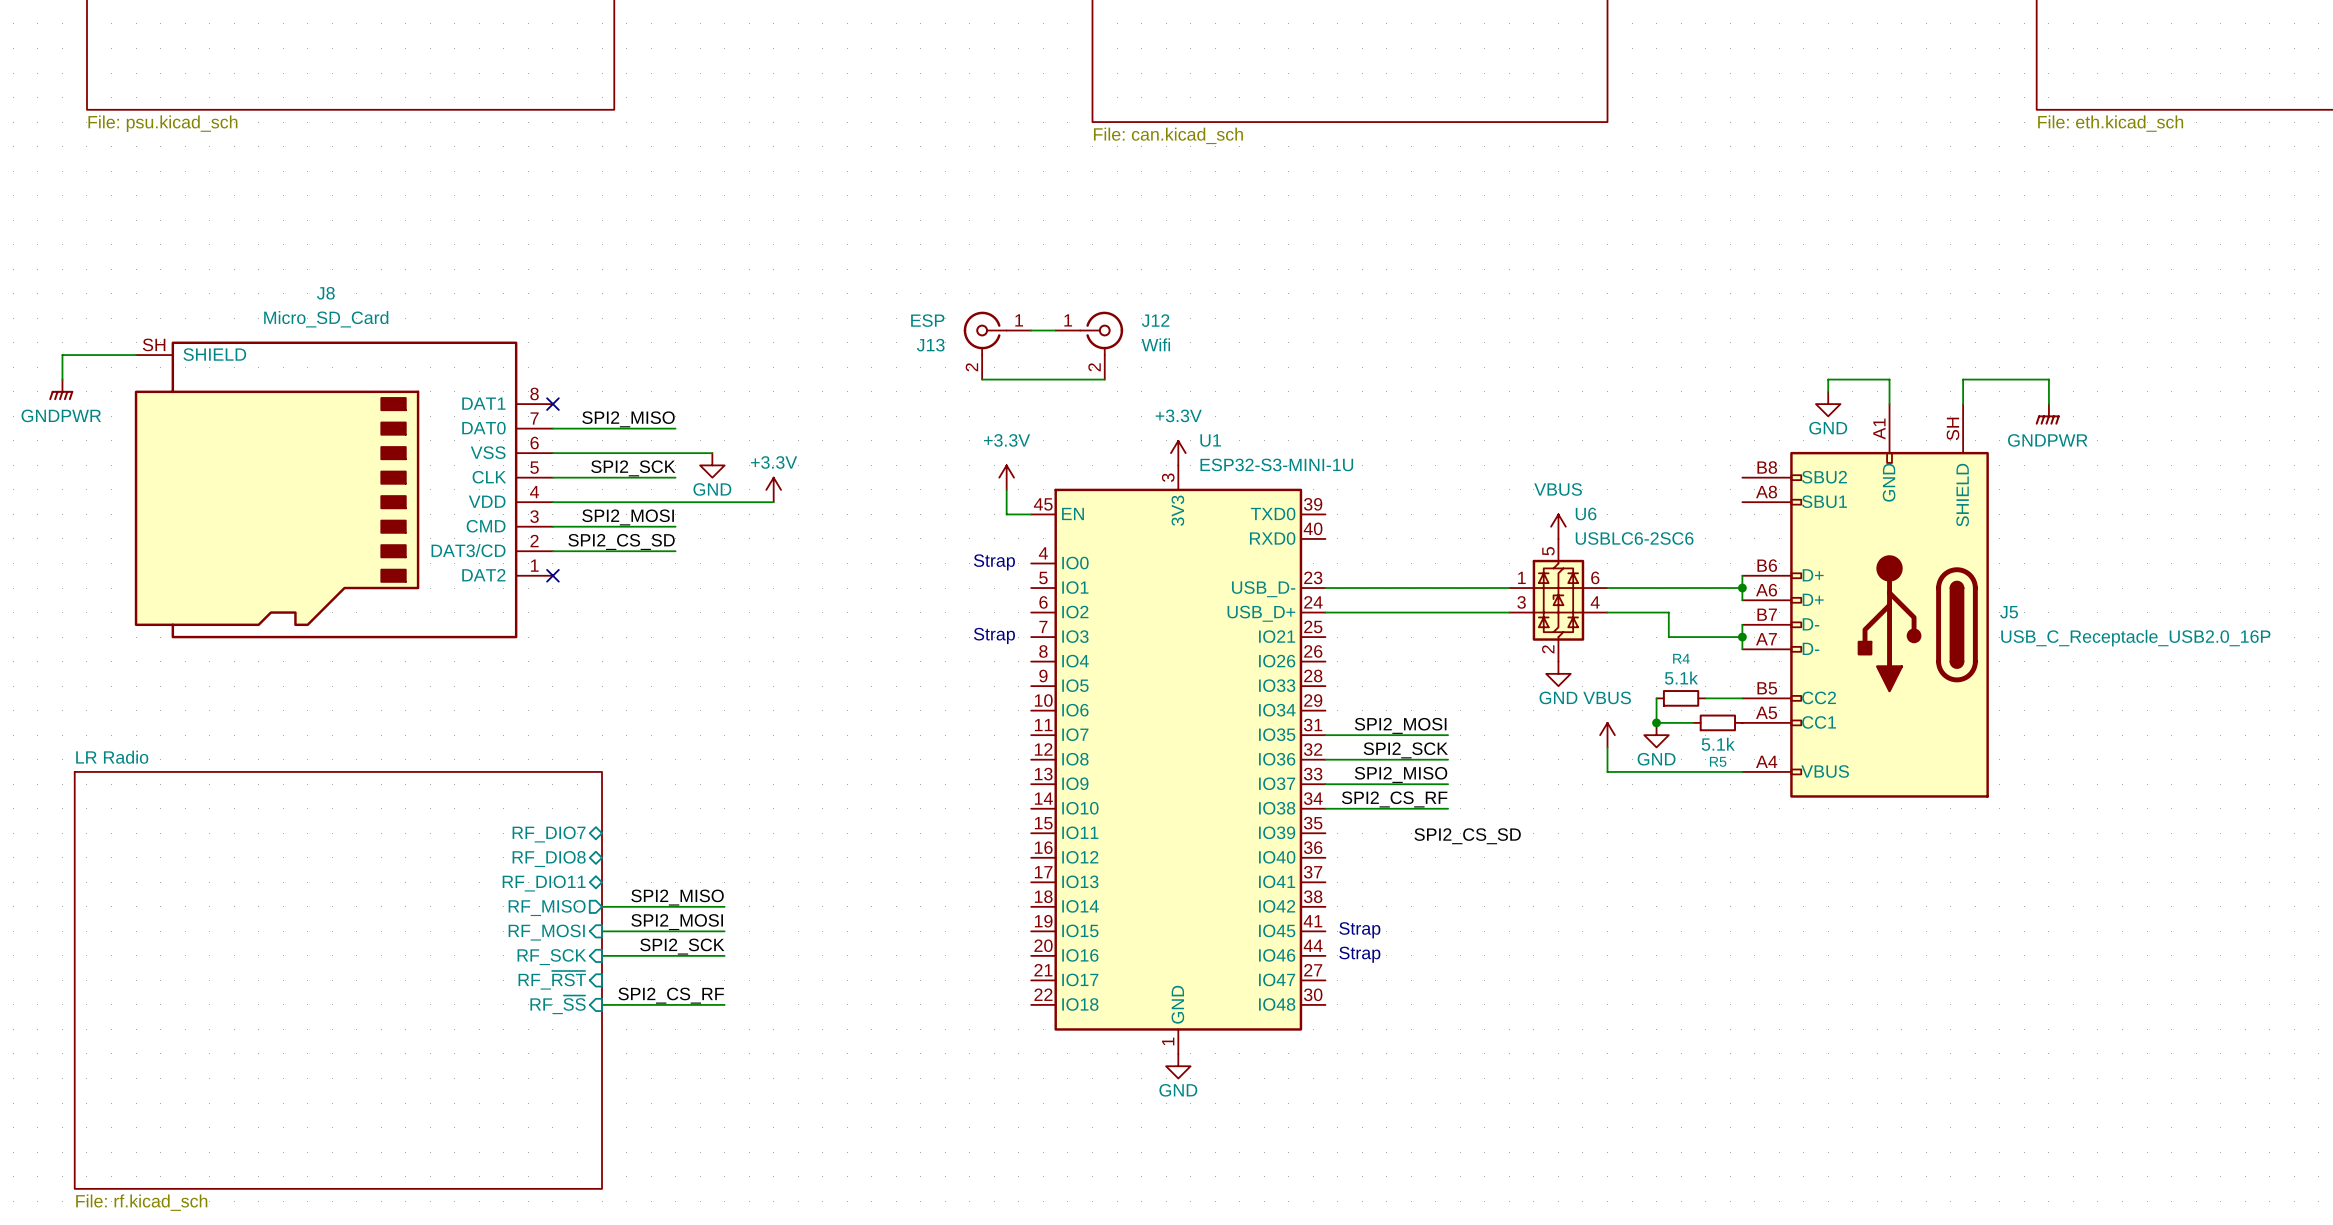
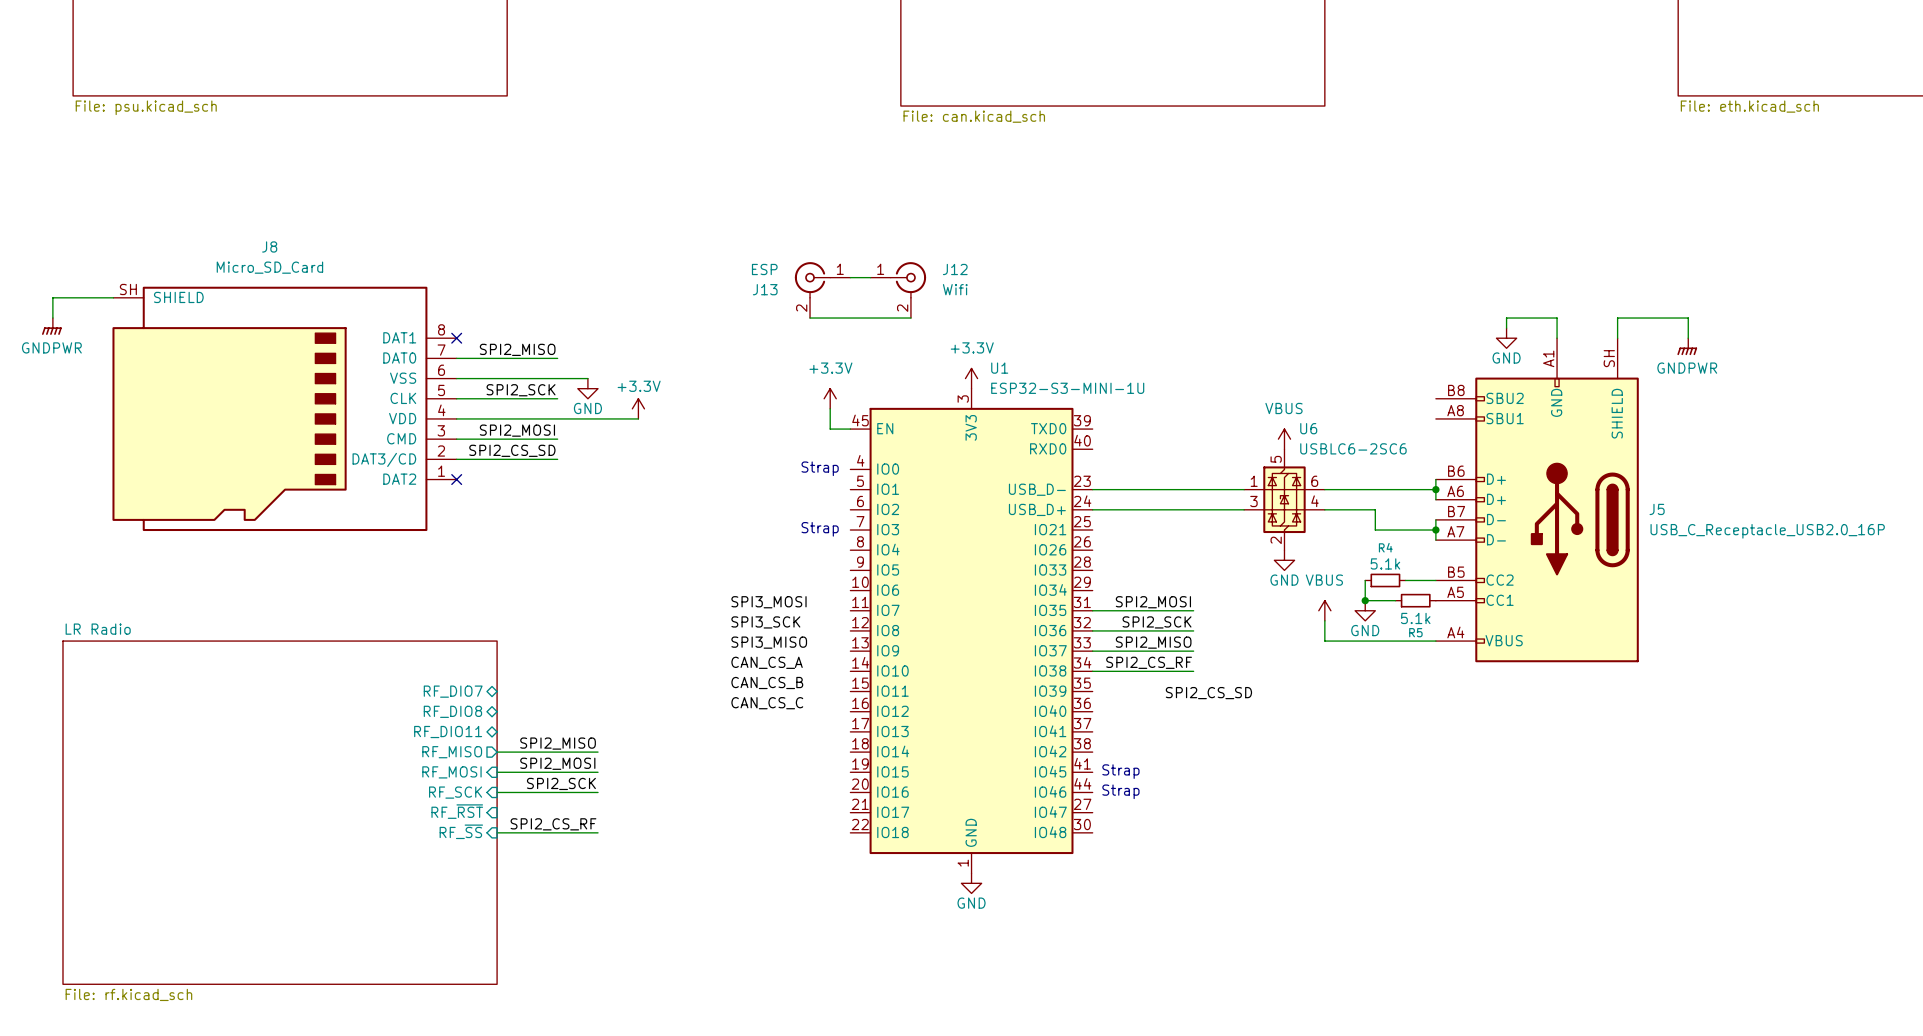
label: none -> SPI3_MOSI (768, 602)
label: none -> SPI3_SCK (765, 622)
label: none -> SPI3_MISO (769, 642)
label: none -> CAN_CS_A (767, 662)
label: none -> CAN_CS_B (767, 682)
label: none -> CAN_CS_C (767, 703)

